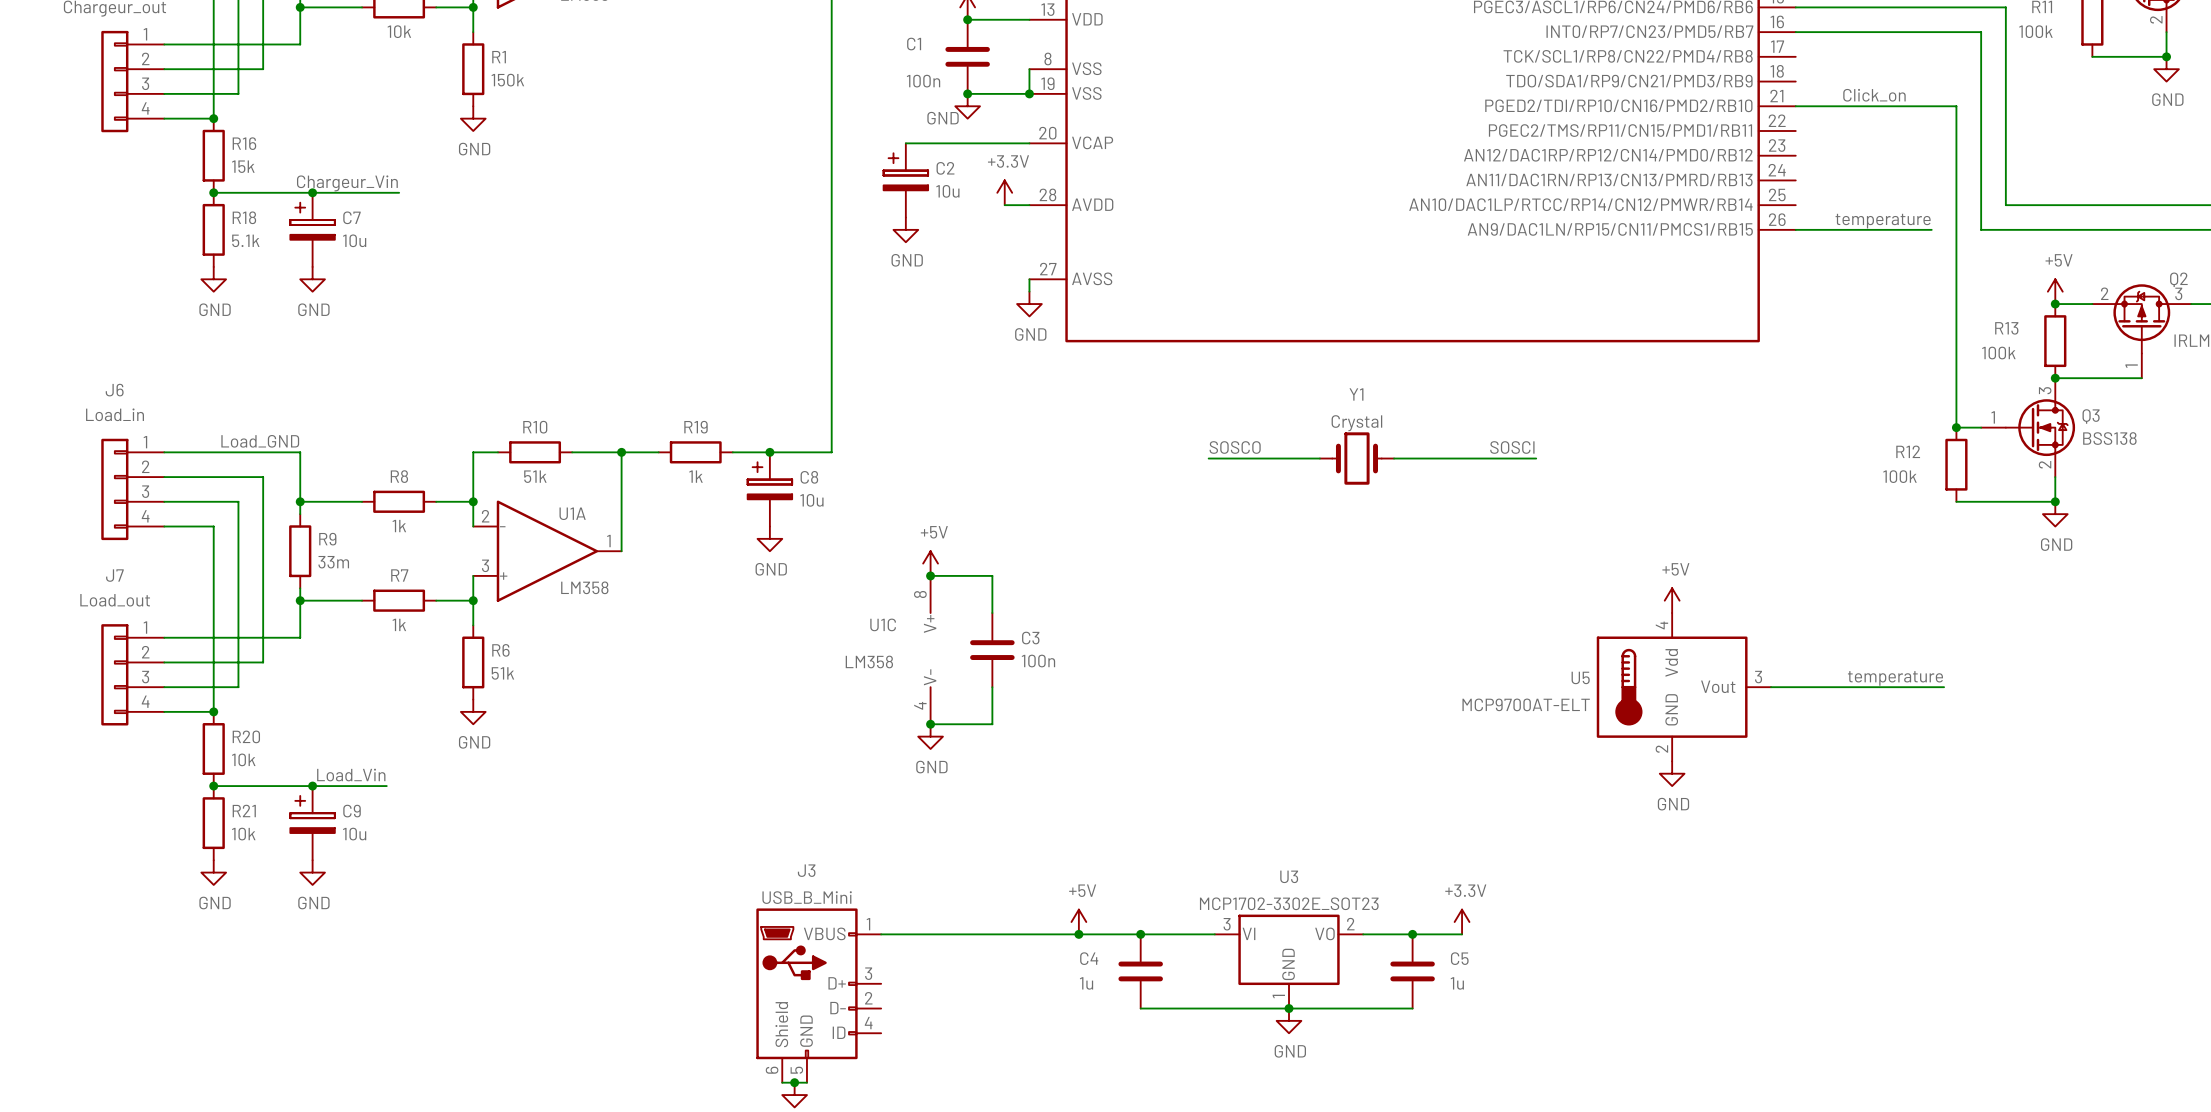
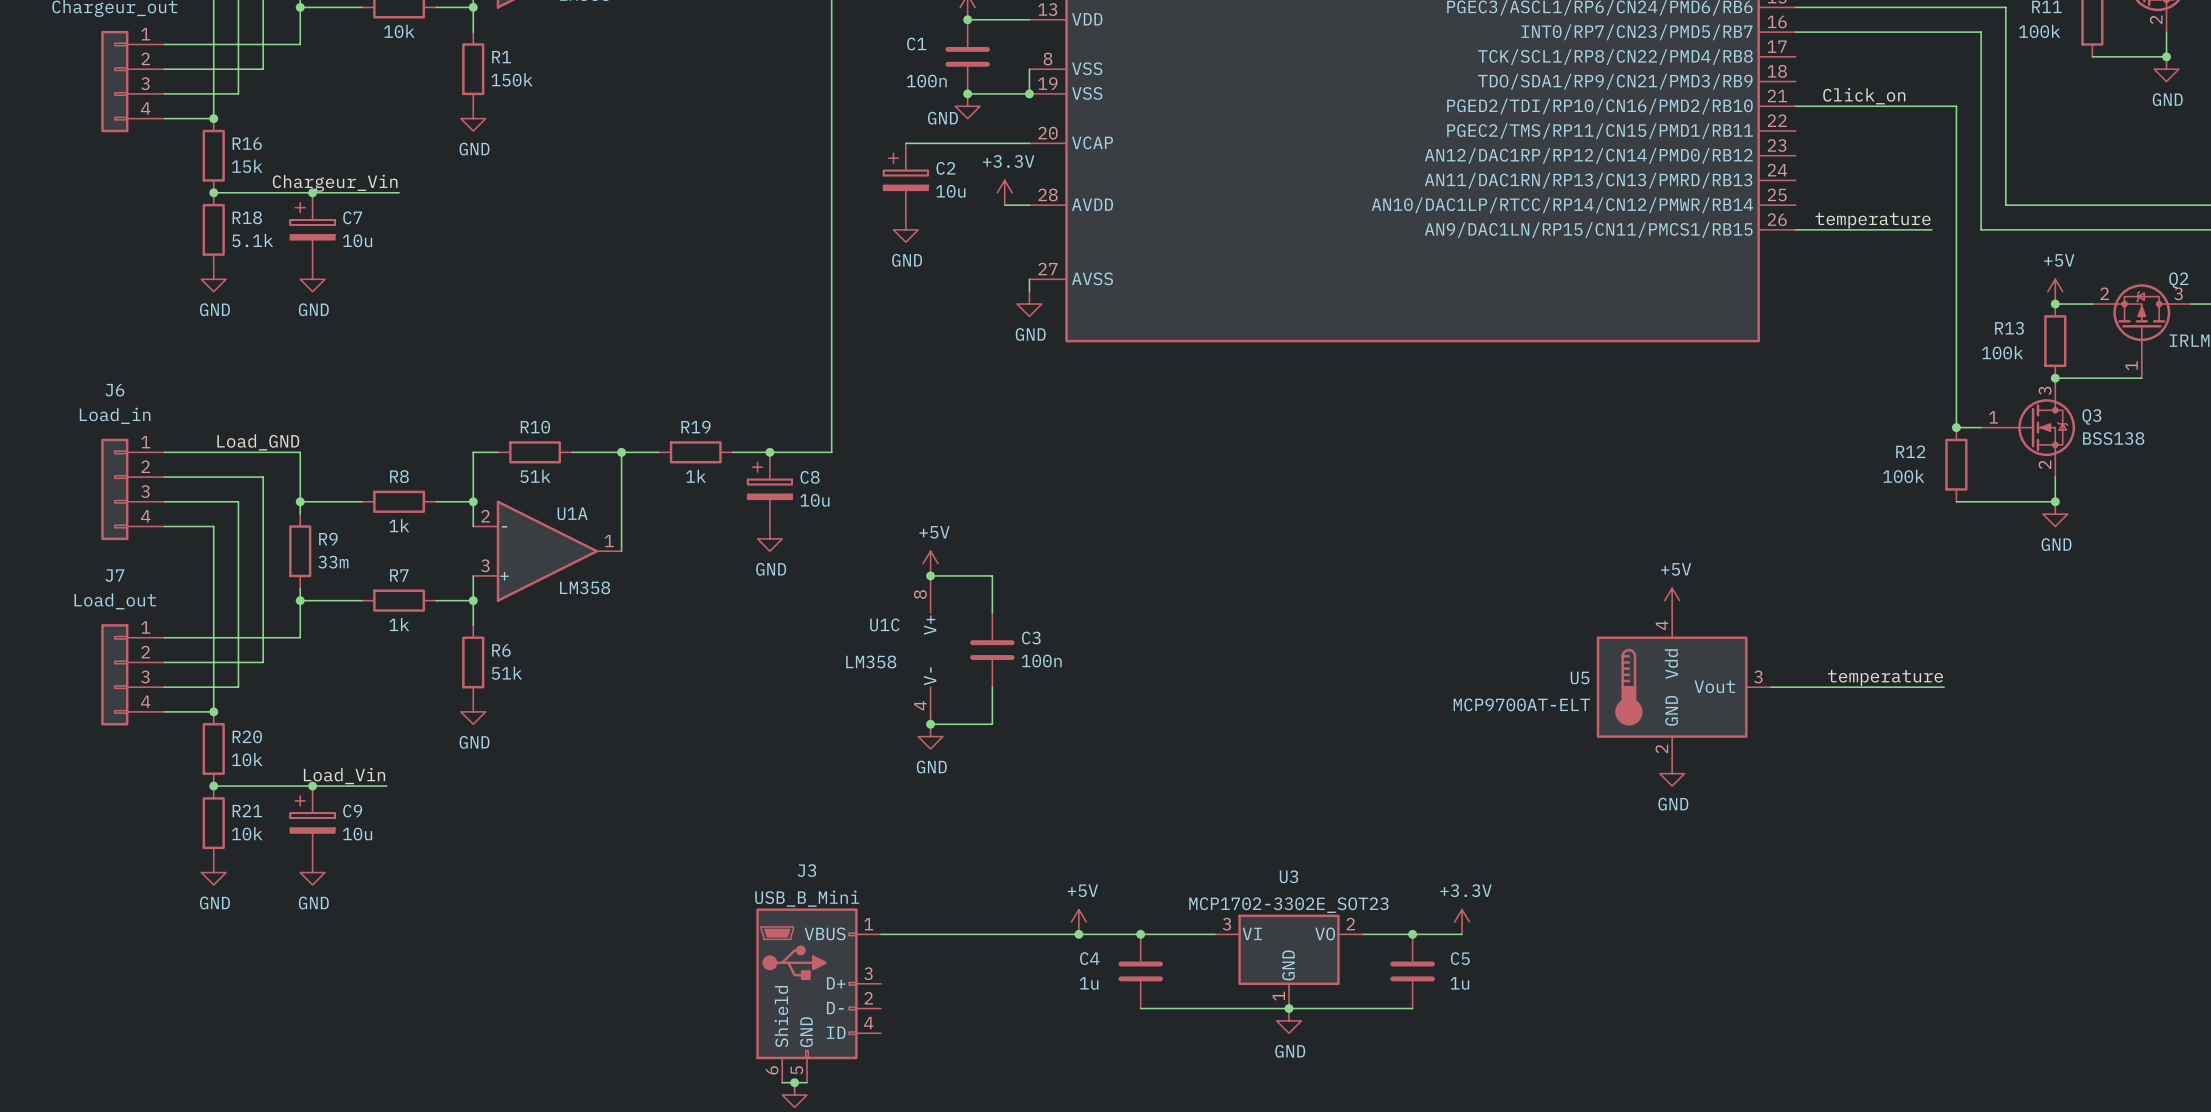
label: SOSCO (1235, 447) -> none
label: SOSCI (1512, 447) -> none
wire: (1208, 458) (1319, 458) -> none
Y1: Crystal (1356, 458) -> none
wire: (1394, 458) (1536, 458) -> none

